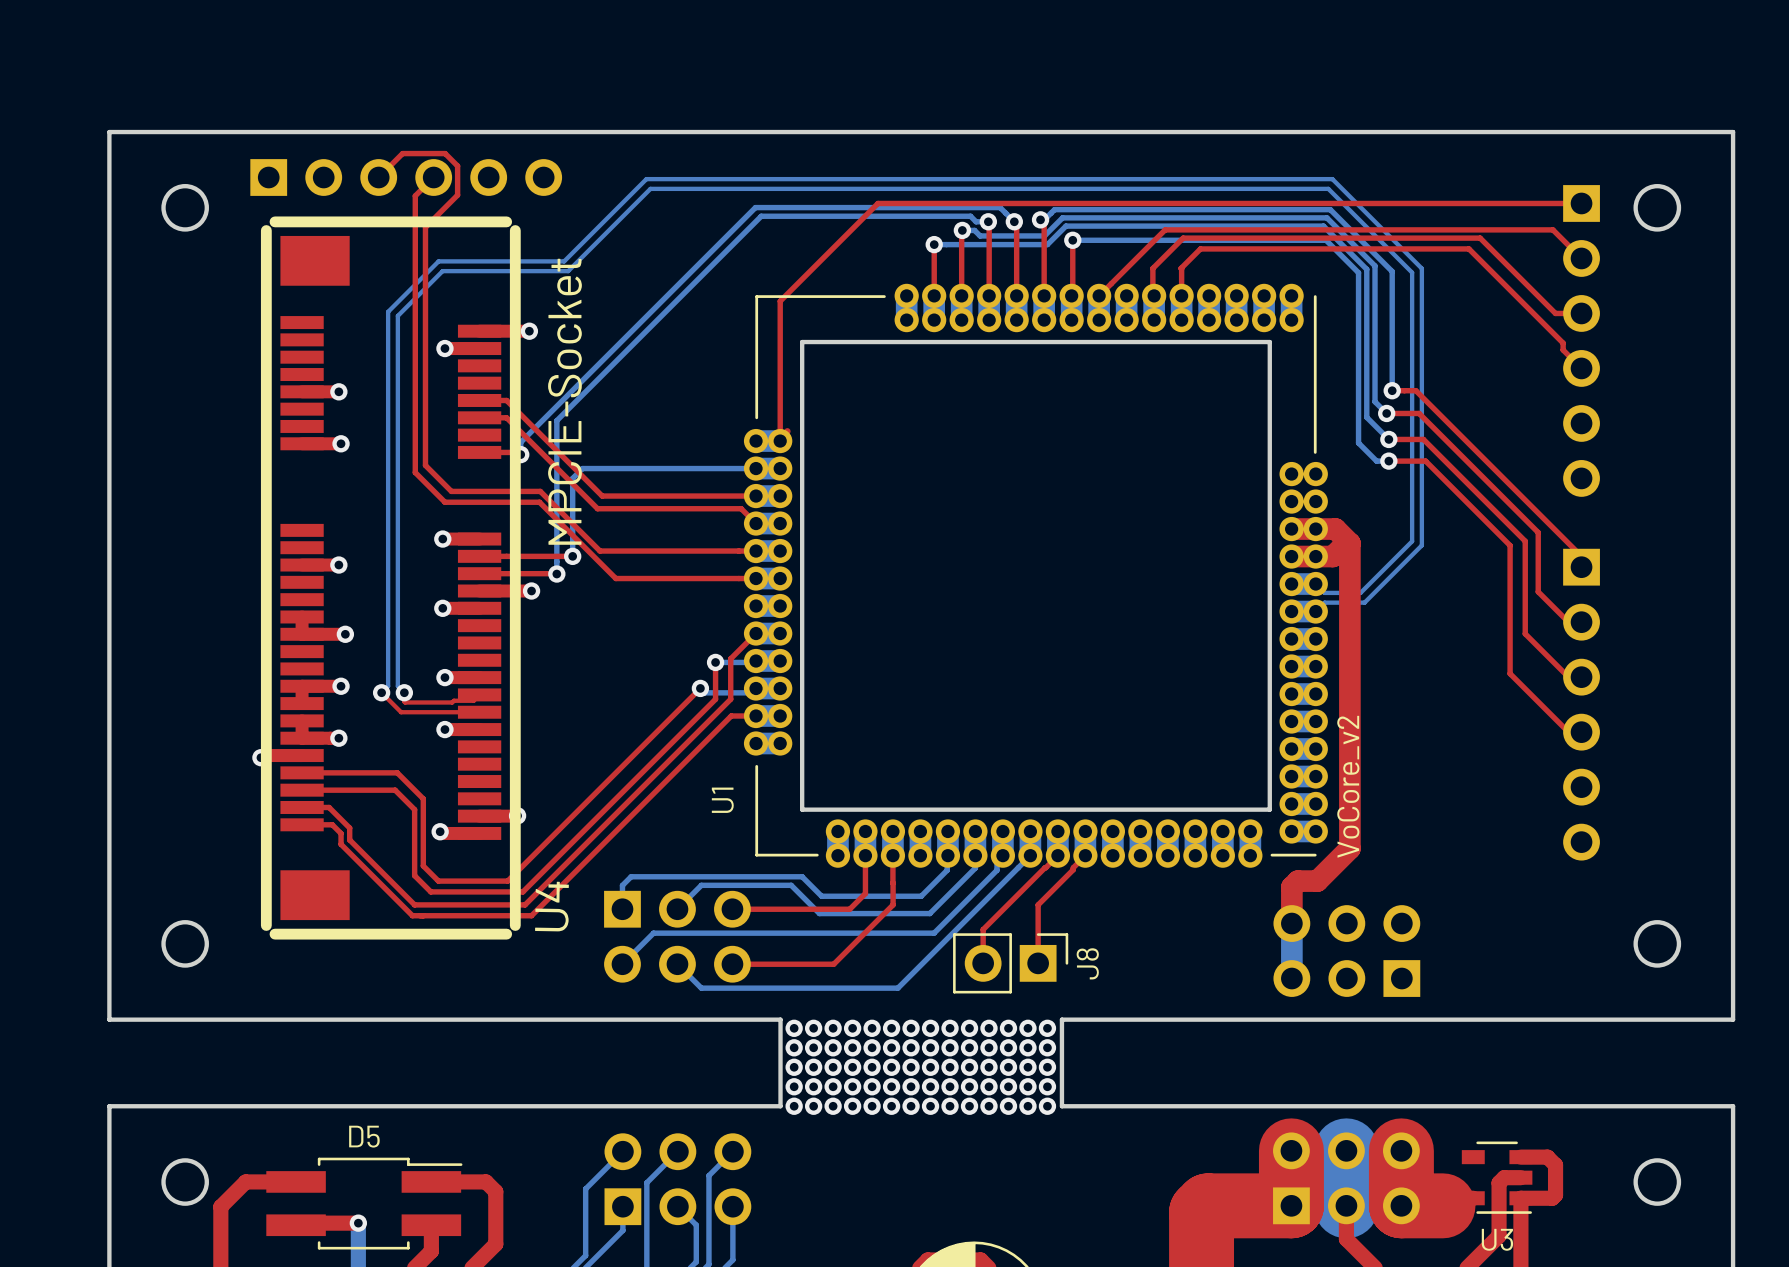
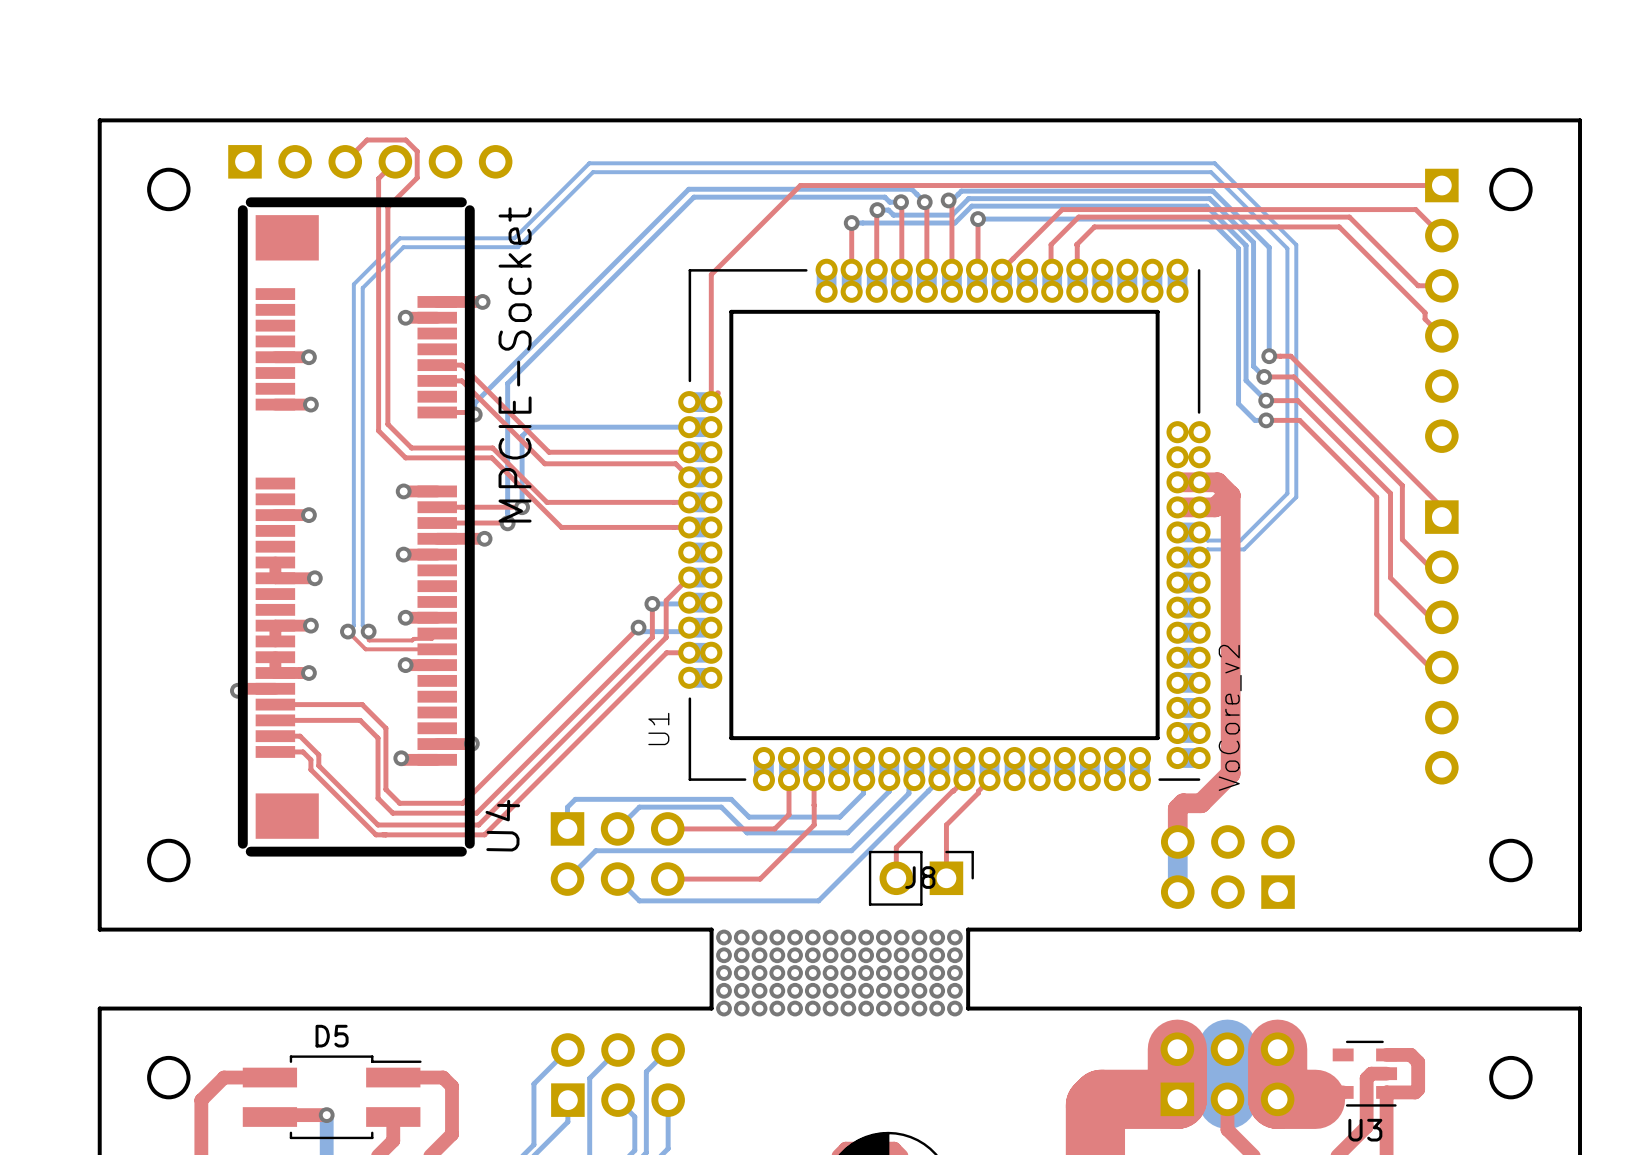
J8 name rotation: 0° (1087, 963) -> 90° clockwise (920, 877)
J8 name position: J8 (1087, 963) -> J8 (920, 877)

